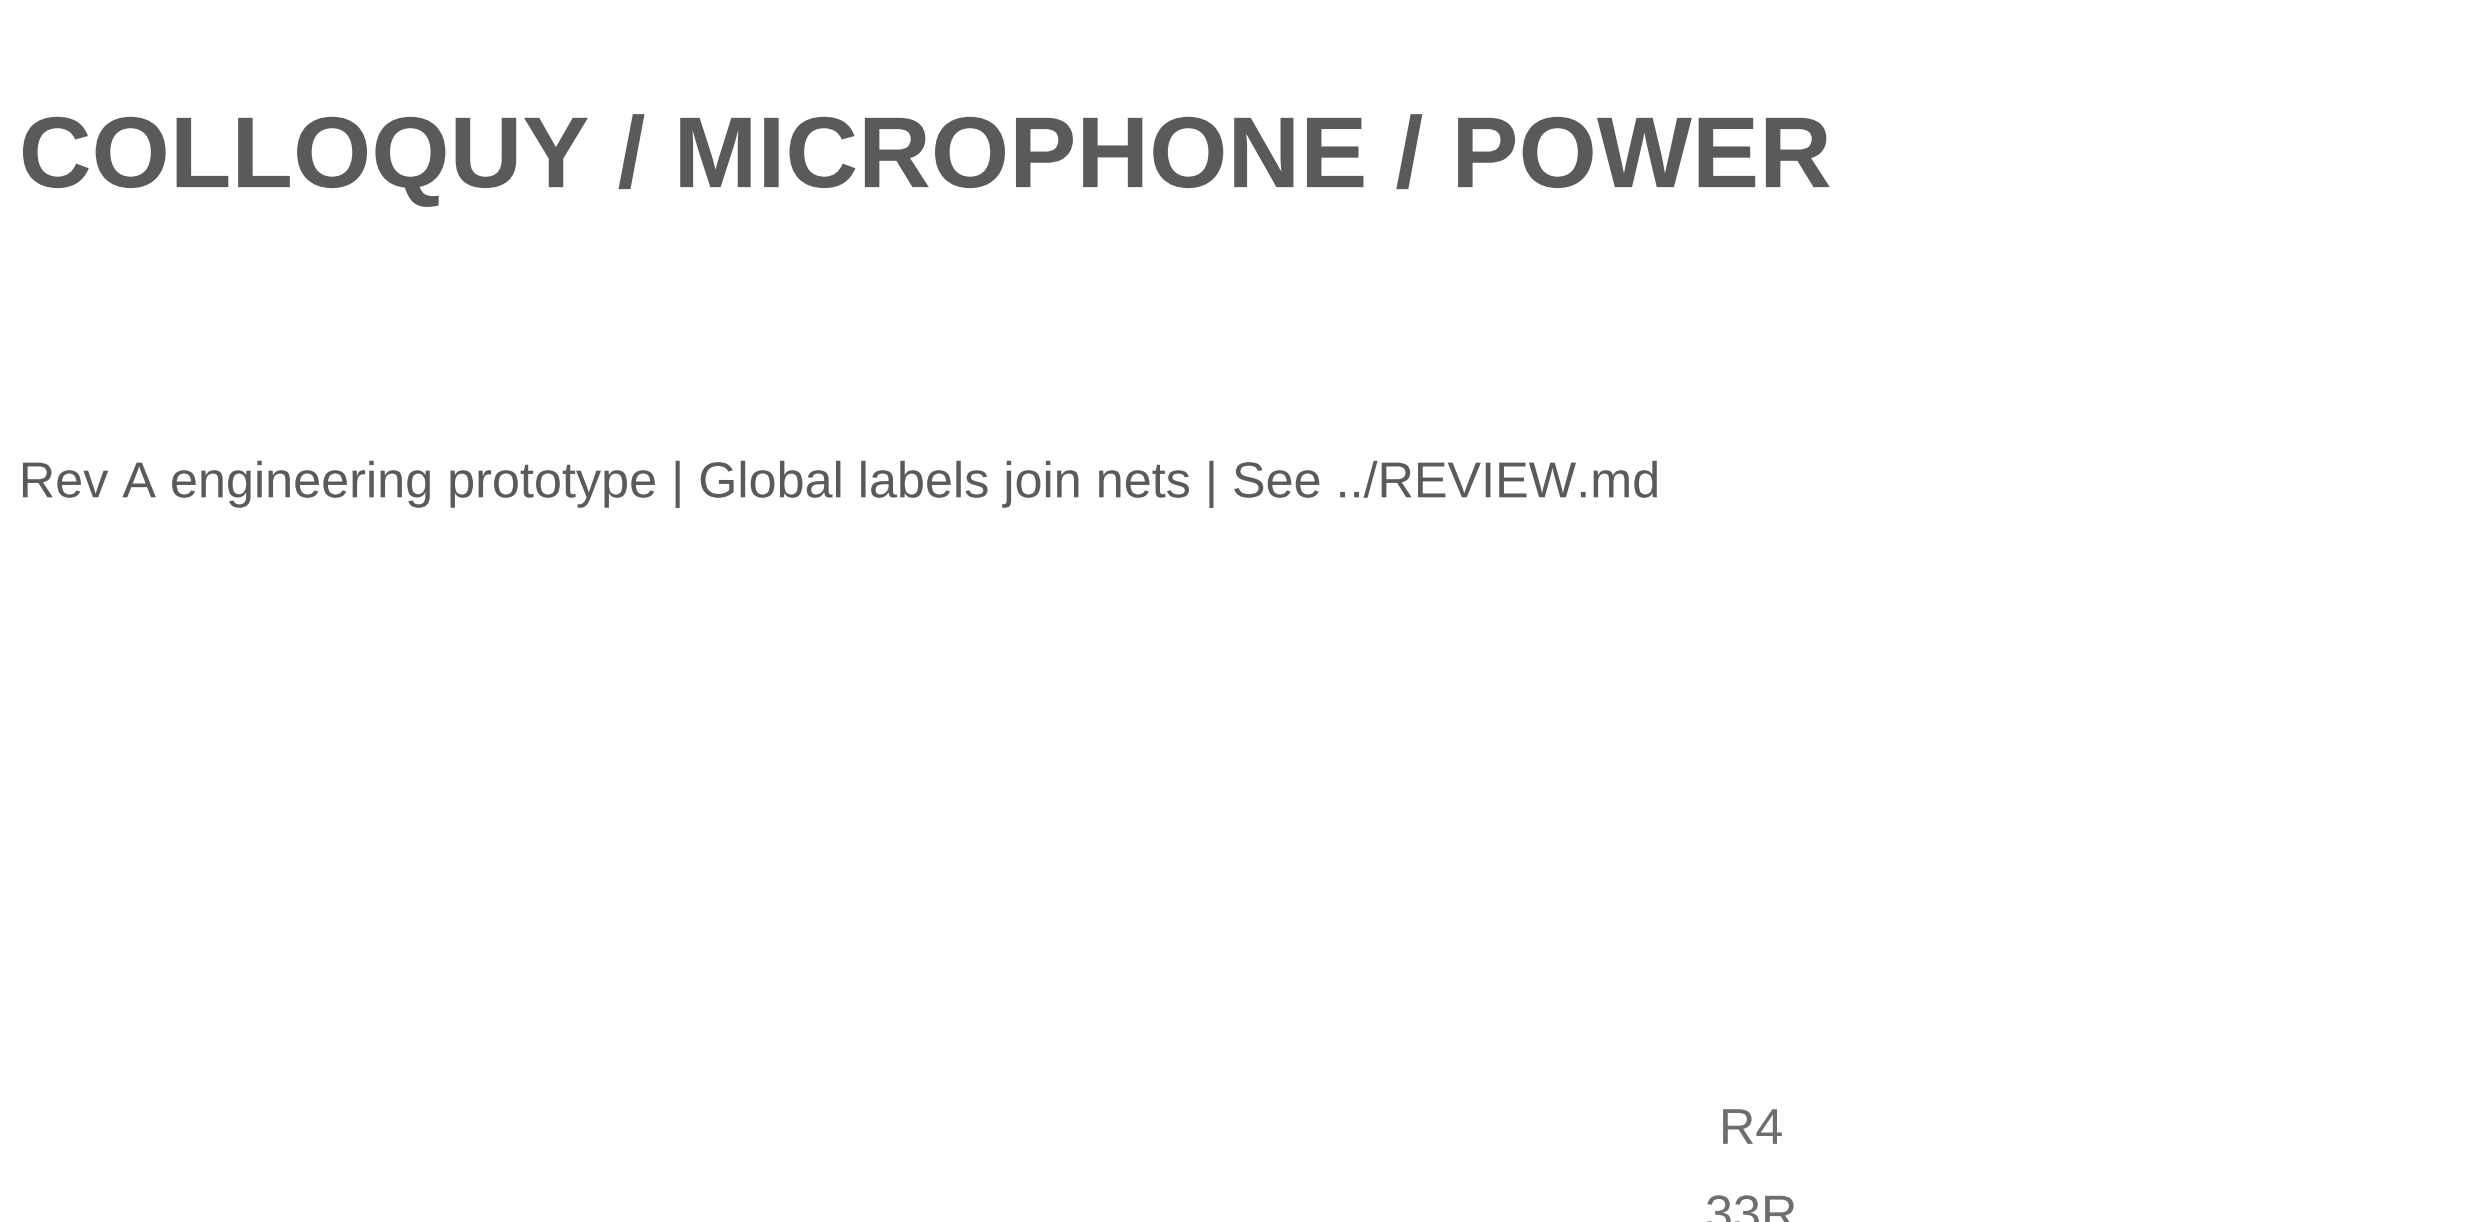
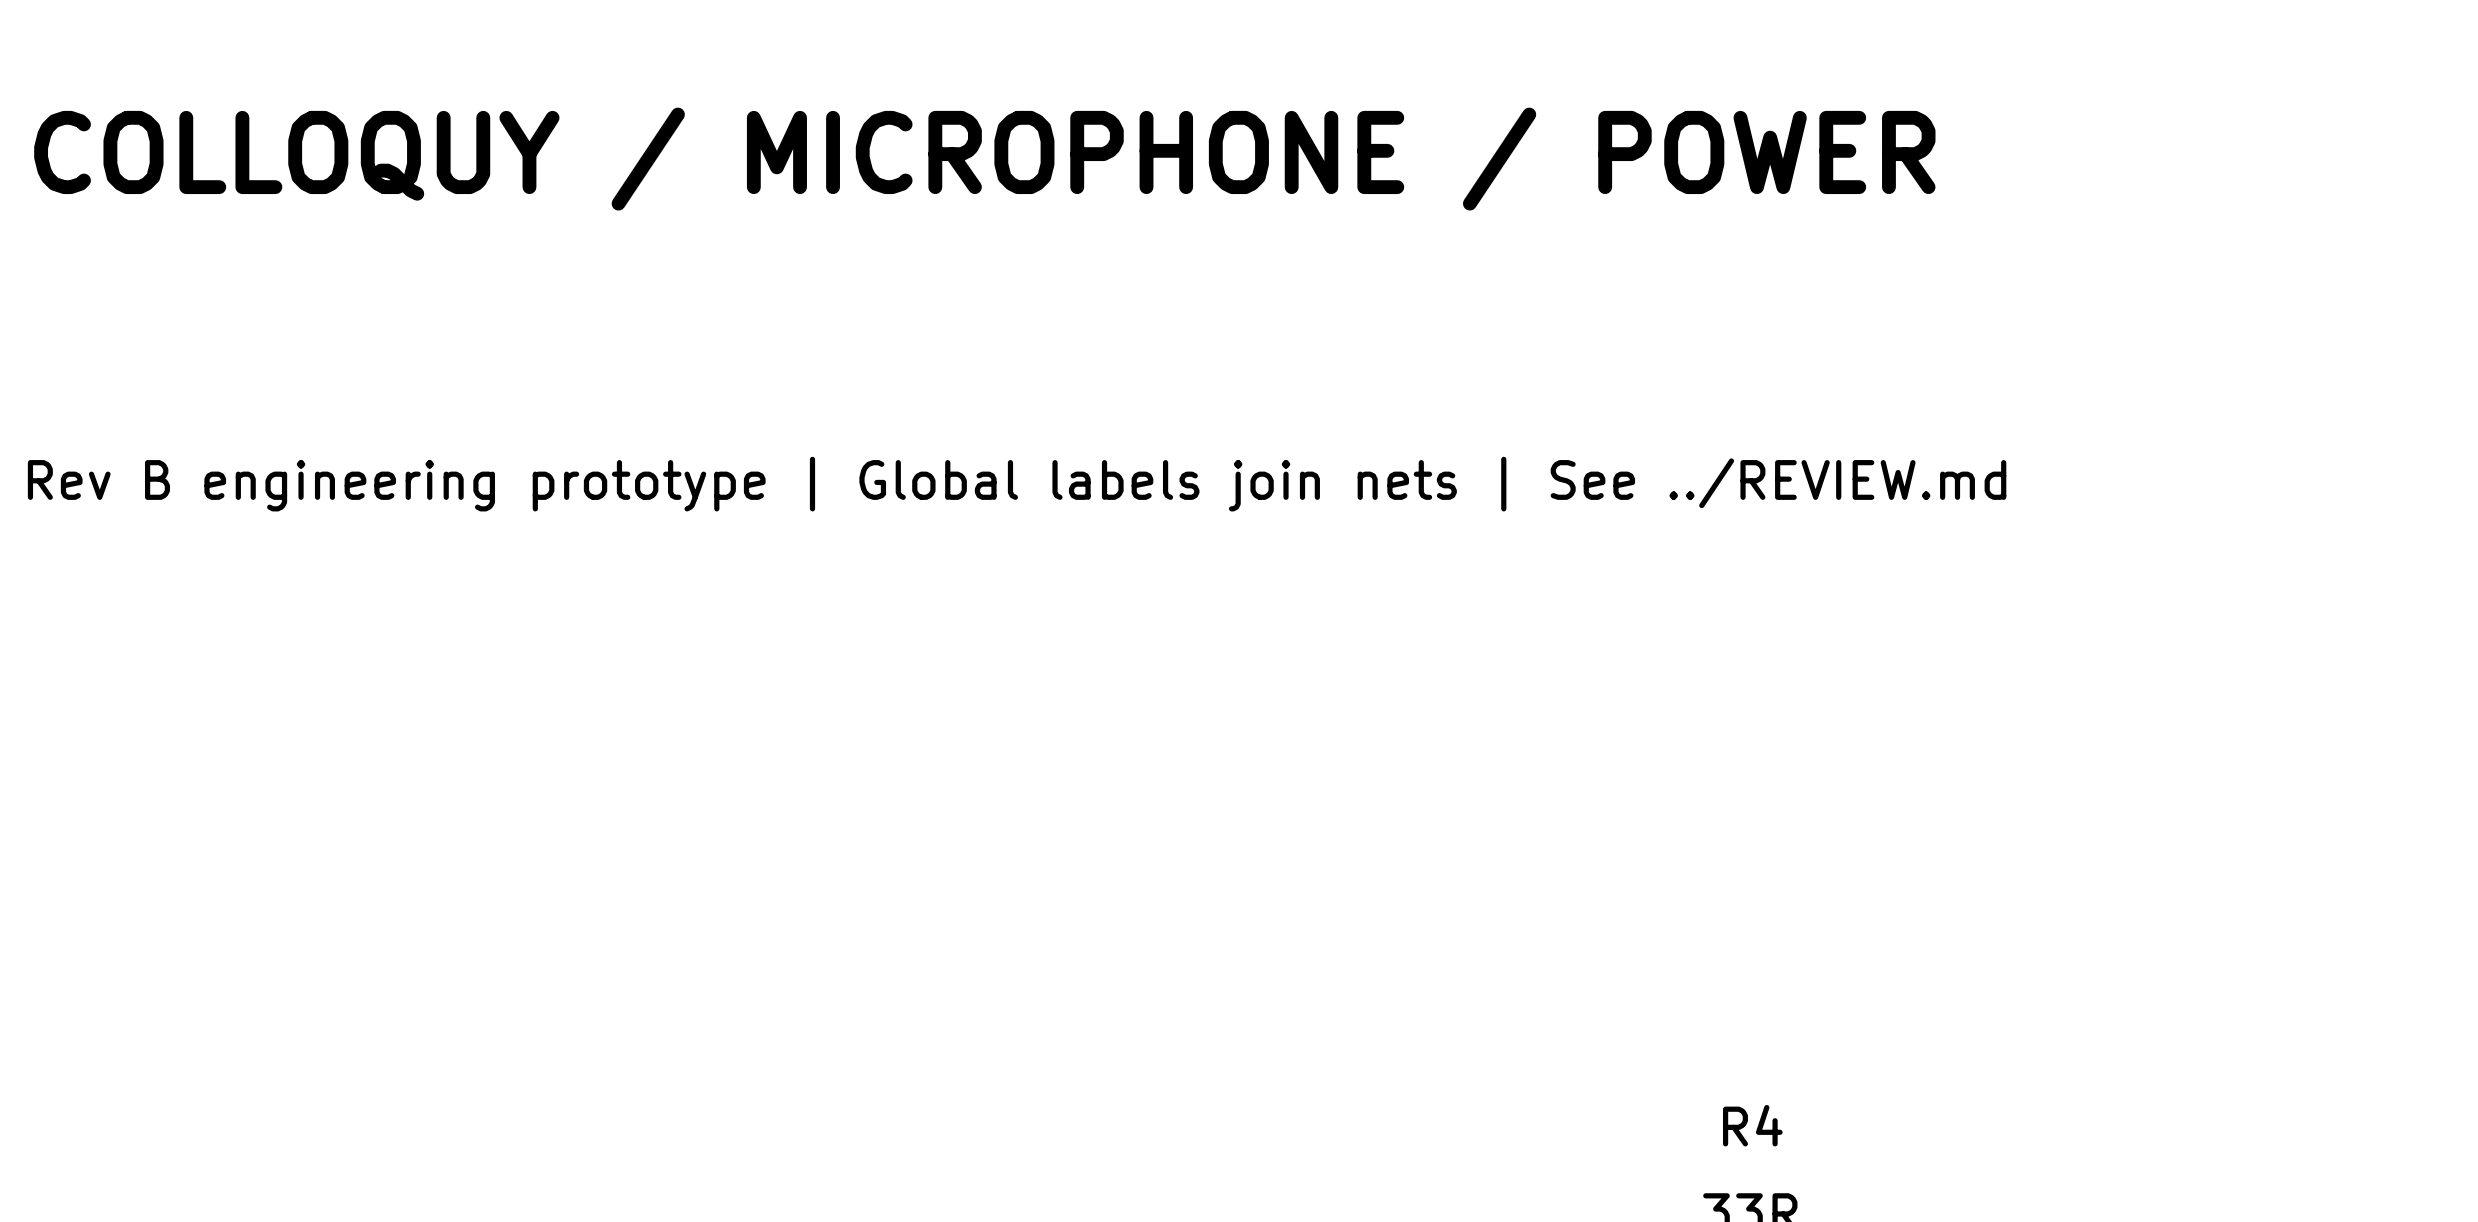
text: Rev A engineering prototype | Global labels join nets | See ../REVIEW.md (839, 484) -> Rev B engineering prototype | Global labels join nets | See ../REVIEW.md (1017, 484)

